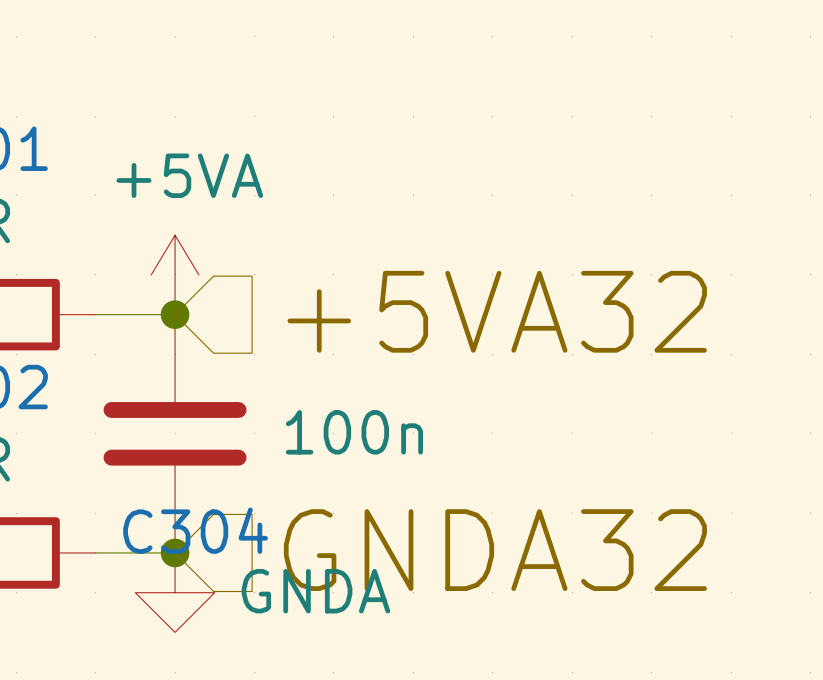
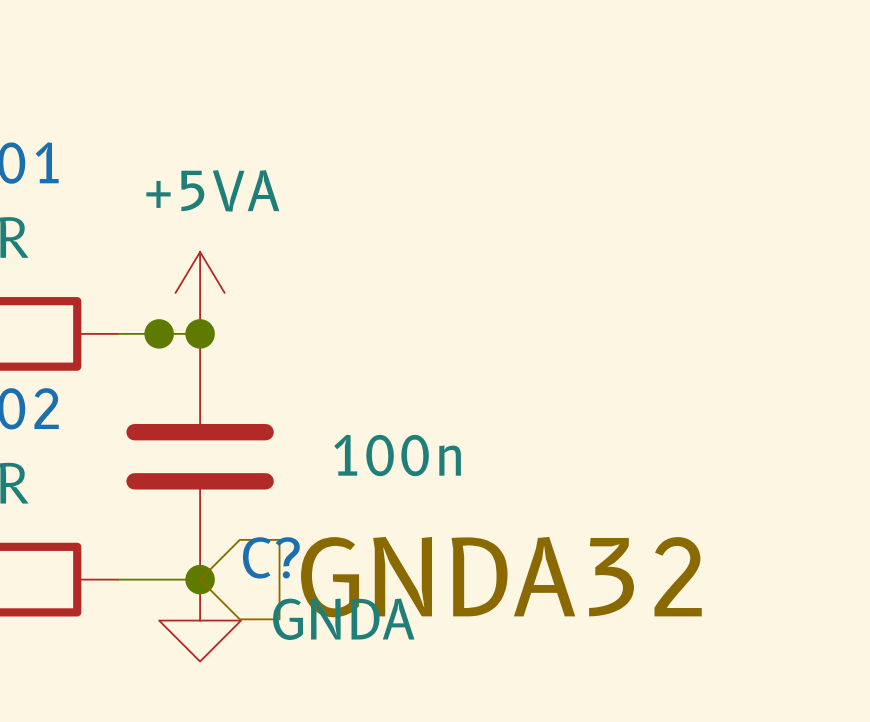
hierarchical label: +5VA32 (497, 311) -> none
junction: none -> (159, 333)
C304 name: C304 (195, 530) -> C? (271, 557)

